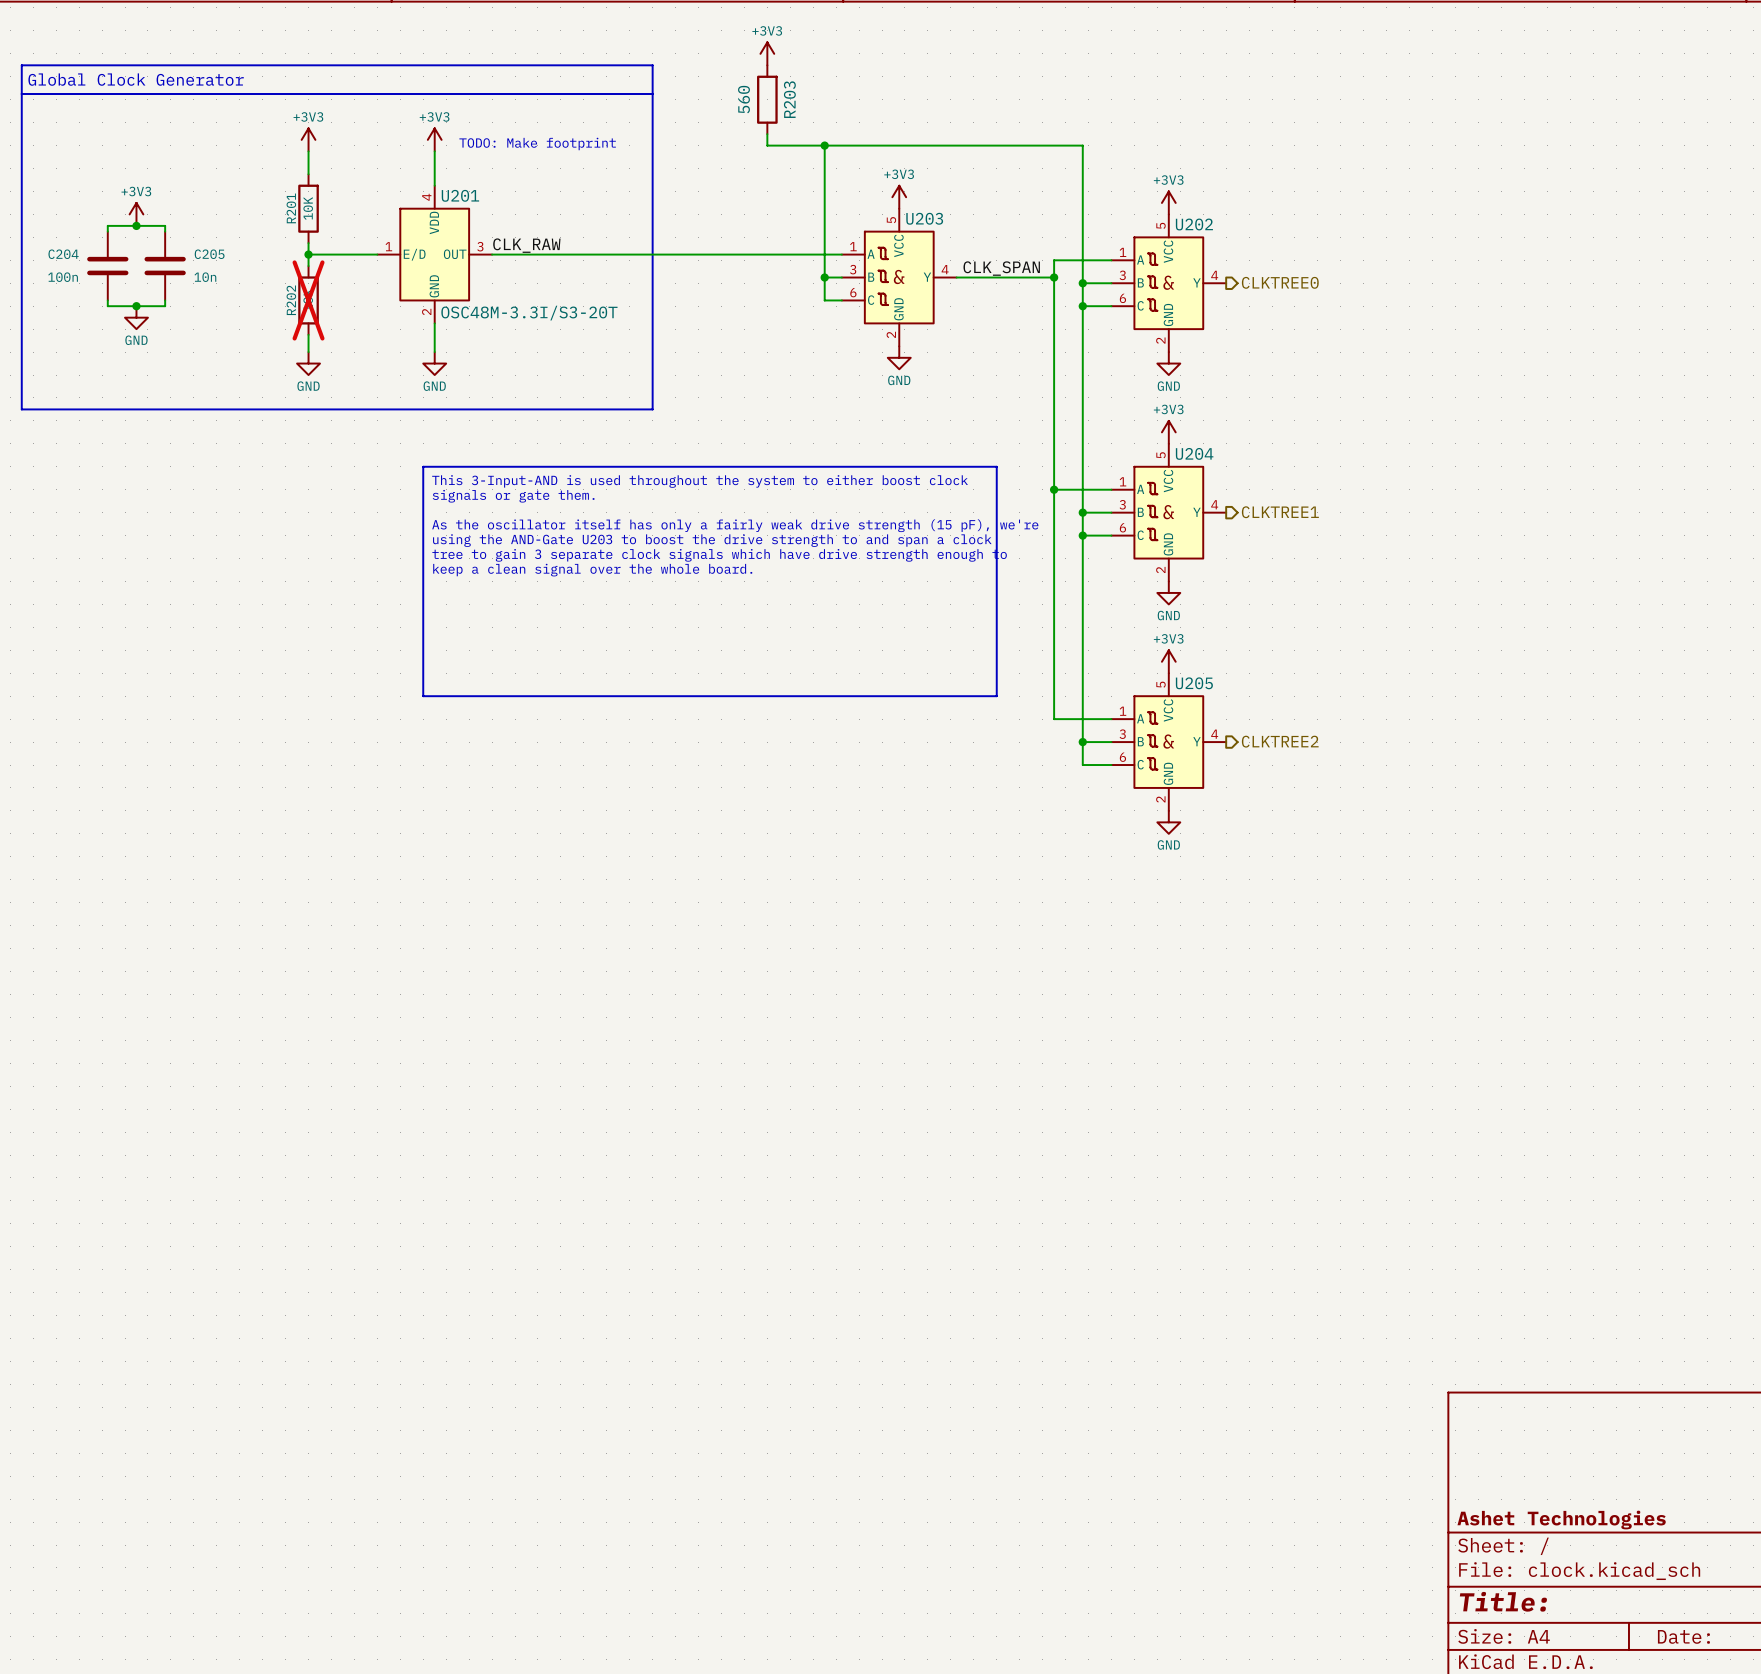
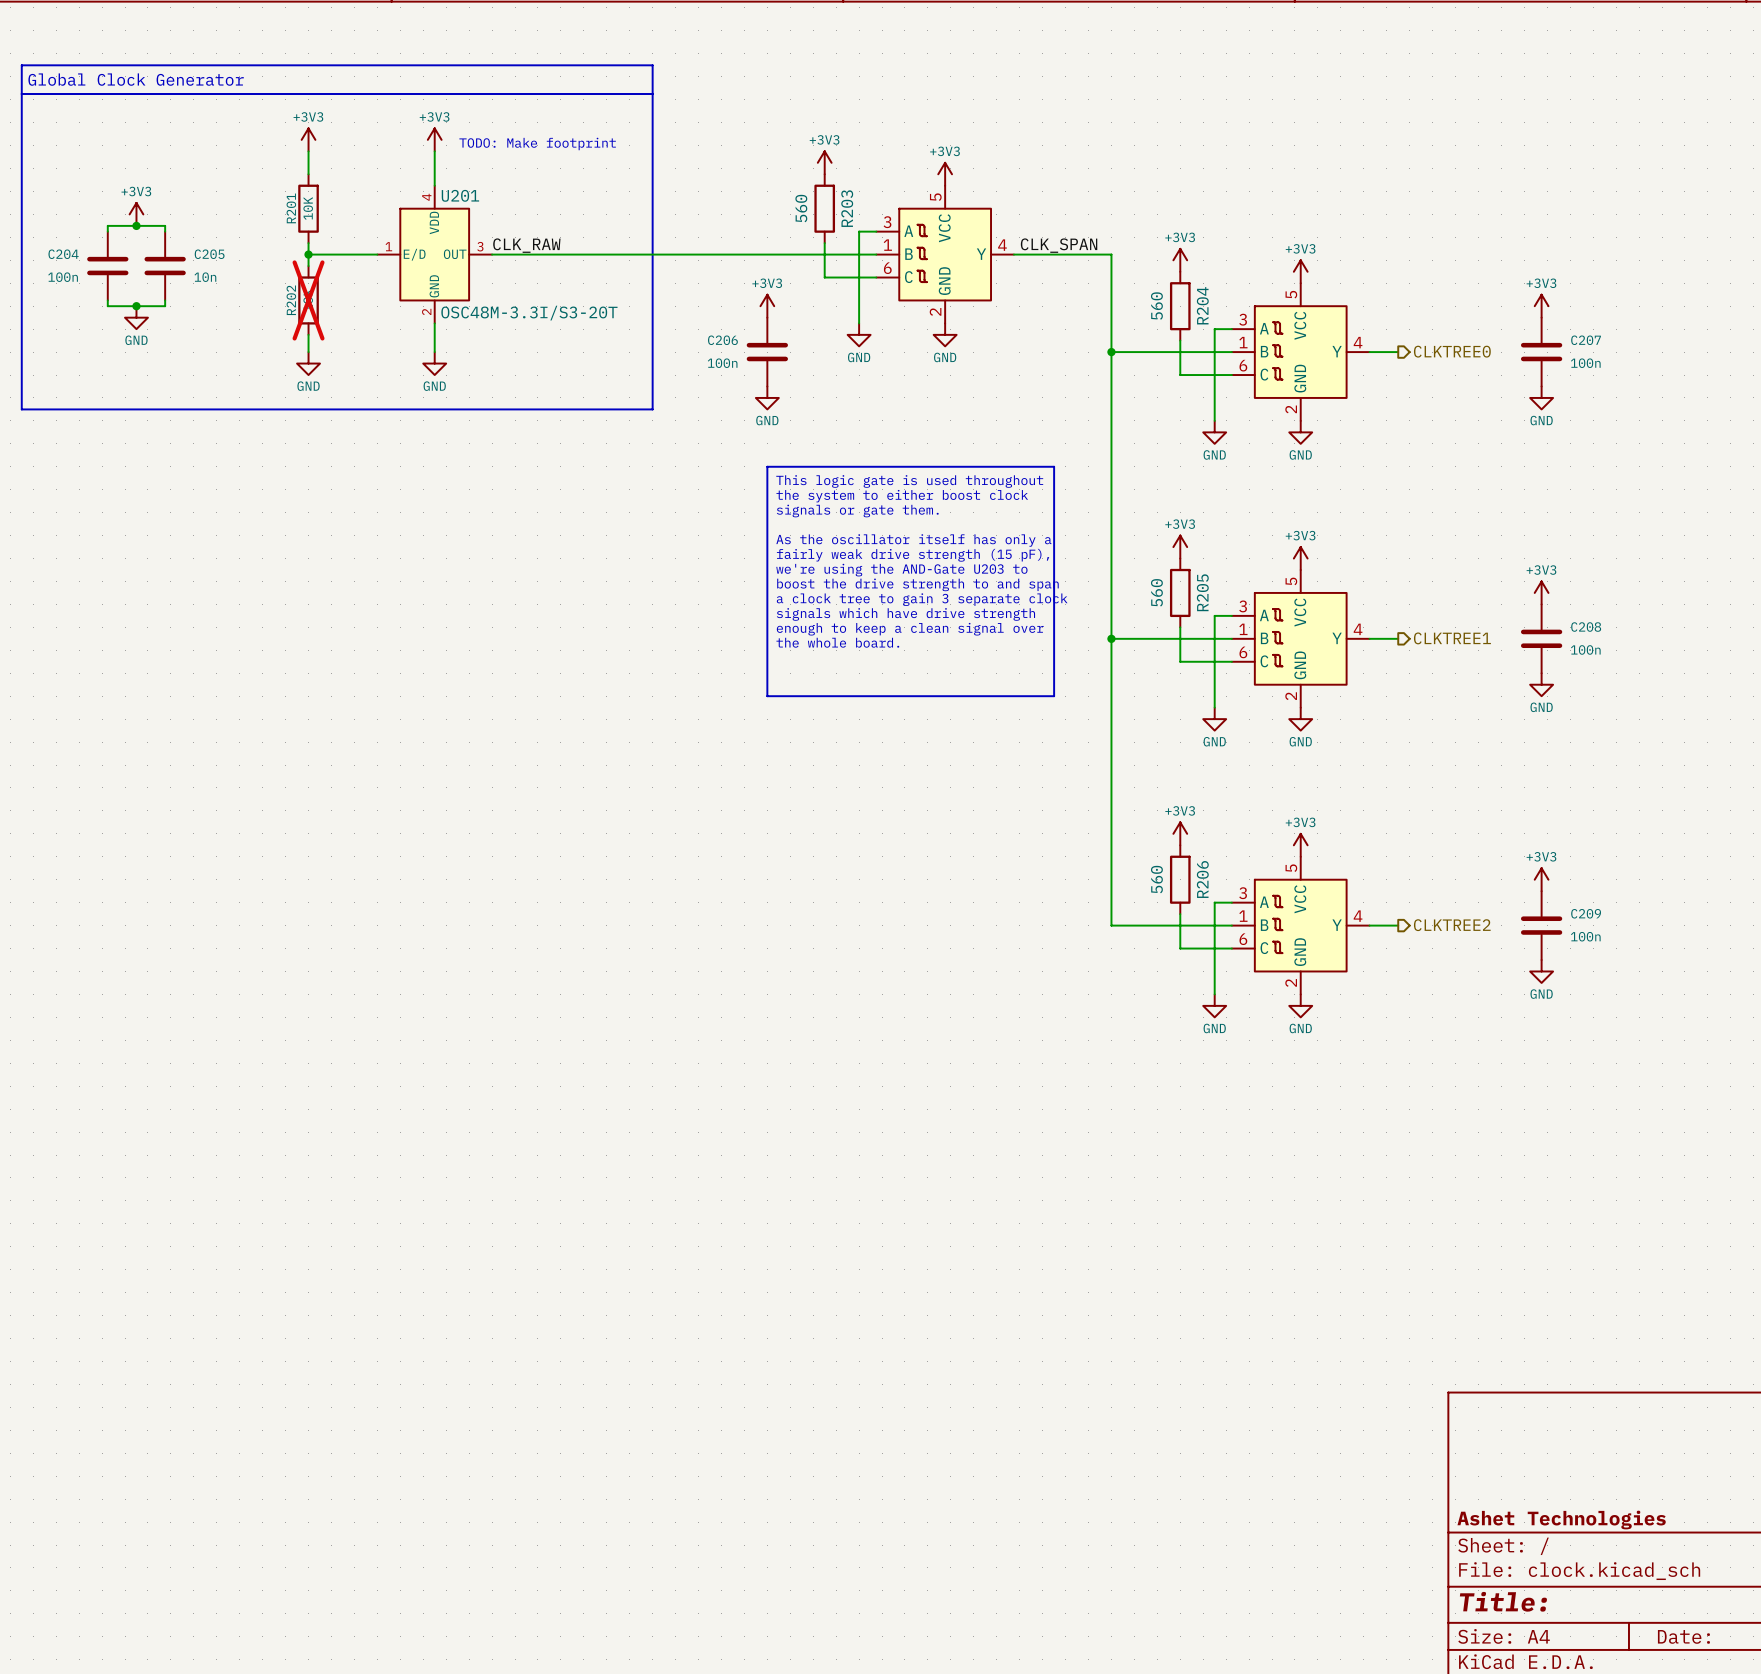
power symbol: +3V3 (767, 53) -> none
R203 position: (767, 99) -> (824, 208)
wire: (767, 134) (767, 145) (1082, 145) (1082, 765) (1111, 765) -> none
wire: (824, 145) (824, 243) -> none
junction: (824, 145) -> none
power symbol: none -> +3V3 (824, 162)
power symbol: none -> +3V3 (945, 174)
power symbol: +3V3 (899, 197) -> none
power symbol position: +3V3 (1168, 202) -> +3V3 (1180, 260)
wire: none -> (876, 231) (859, 231) (859, 323)
part: none -> (945, 254)
wire: none -> (1013, 254) (1111, 254) (1111, 925) (1231, 925)
wire: (1111, 260) (1054, 260) (1054, 719) (1111, 719) -> none
label position: CLK_SPAN (1001, 268) -> CLK_SPAN (1059, 245)
power symbol: none -> +3V3 (1300, 271)
wire: (824, 277) (824, 300) (841, 300) -> none
junction: (824, 277) -> none
U203: (899, 277) -> none
wire: (956, 277) (1054, 277) -> none
junction: (1054, 277) -> none
hierarchical label position: CLKTREE0 (1280, 282) -> CLKTREE0 (1452, 351)
wire: (1082, 283) (1111, 283) -> none
junction: (1082, 283) -> none
U202: (1168, 283) -> none
power symbol: none -> +3V3 (767, 306)
wire: (1082, 306) (1111, 306) -> none
junction: (1082, 306) -> none
R204: none -> 560 (1180, 306)
power symbol: none -> +3V3 (1541, 306)
wire: none -> (1231, 329) (1214, 329) (1214, 420)
power symbol: none -> GND (859, 334)
power symbol: none -> GND (945, 334)
wire: none -> (1180, 340) (1180, 375) (1231, 375)
C206: none -> 100n (767, 352)
wire: none -> (1111, 352) (1231, 352)
junction: none -> (1111, 352)
part: none -> (1300, 352)
wire: none -> (1369, 352) (1398, 352)
C207: none -> 100n (1541, 352)
power symbol: GND (899, 357) -> none
power symbol: GND (1168, 363) -> none
power symbol: none -> GND (767, 397)
power symbol: none -> GND (1541, 397)
power symbol: +3V3 (1168, 432) -> none
power symbol: none -> GND (1214, 432)
power symbol: none -> GND (1300, 432)
line: (767, 466) (423, 466) (423, 696) (767, 696) -> (767, 466) (767, 696)
line: (996, 466) (996, 696) -> (996, 466) (1054, 466) (1054, 696) (996, 696)
text: This 3-Input-AND is used throughout the system to either boost clock (700, 481) -> none
text: none -> This logic gate is used throughout (909, 481)
wire: (1054, 489) (1111, 489) -> none
junction: (1054, 489) -> none
text: signals or gate them. (513, 496) -> none
text: none -> the system to either boost clock (902, 496)
text: none -> signals or gate them. (857, 511)
wire: (1082, 512) (1111, 512) -> none
junction: (1082, 512) -> none
U204: (1168, 512) -> none
hierarchical label position: CLKTREE1 (1280, 512) -> CLKTREE1 (1452, 638)
text: As the oscillator itself has only a fairly weak drive strength (15 pF), we're (735, 525) -> none
wire: (1082, 535) (1111, 535) -> none
junction: (1082, 535) -> none
text: using the AND-Gate U203 to boost the drive strength to and span a clock (712, 540) -> none
text: none -> As the oscillator itself has only a (913, 540)
power symbol: none -> +3V3 (1180, 547)
text: tree to gain 3 separate clock signals which have drive strength enough to (719, 555) -> none
text: none -> fairly weak drive strength (15 pF), (913, 555)
power symbol: none -> +3V3 (1300, 558)
text: keep a clean signal over the whole board. (592, 570) -> none
text: none -> we're using the AND-Gate U203 to (901, 570)
text: none -> boost the drive strength to and span (917, 584)
power symbol: GND (1168, 592) -> none
R205: none -> 560 (1180, 592)
power symbol: none -> +3V3 (1541, 592)
text: none -> a clock tree to gain 3 separate clock (922, 599)
text: none -> signals which have drive strength (905, 614)
wire: none -> (1231, 615) (1214, 615) (1214, 707)
wire: none -> (1180, 627) (1180, 661) (1231, 661)
text: none -> enough to keep a clean signal over (910, 629)
wire: none -> (1111, 638) (1231, 638)
junction: none -> (1111, 638)
part: none -> (1300, 638)
wire: none -> (1369, 638) (1398, 638)
C208: none -> 100n (1541, 638)
text: none -> the whole board. (837, 642)
power symbol: +3V3 (1168, 661) -> none
power symbol: none -> GND (1541, 684)
power symbol: none -> GND (1214, 719)
power symbol: none -> GND (1300, 719)
hierarchical label: CLKTREE2 (1280, 741) -> none
wire: (1082, 742) (1111, 742) -> none
junction: (1082, 742) -> none
U205: (1168, 742) -> none
power symbol: GND (1168, 822) -> none
power symbol: none -> +3V3 (1180, 833)
power symbol: none -> +3V3 (1300, 845)
R206: none -> 560 (1180, 879)
power symbol: none -> +3V3 (1541, 879)
wire: none -> (1231, 902) (1214, 902) (1214, 994)
wire: none -> (1180, 914) (1180, 948) (1231, 948)
part: none -> (1300, 925)
wire: none -> (1369, 925) (1398, 925)
hierarchical label: none -> CLKTREE2 (1452, 925)
C209: none -> 100n (1541, 925)
power symbol: none -> GND (1541, 971)
power symbol: none -> GND (1214, 1005)
power symbol: none -> GND (1300, 1005)

